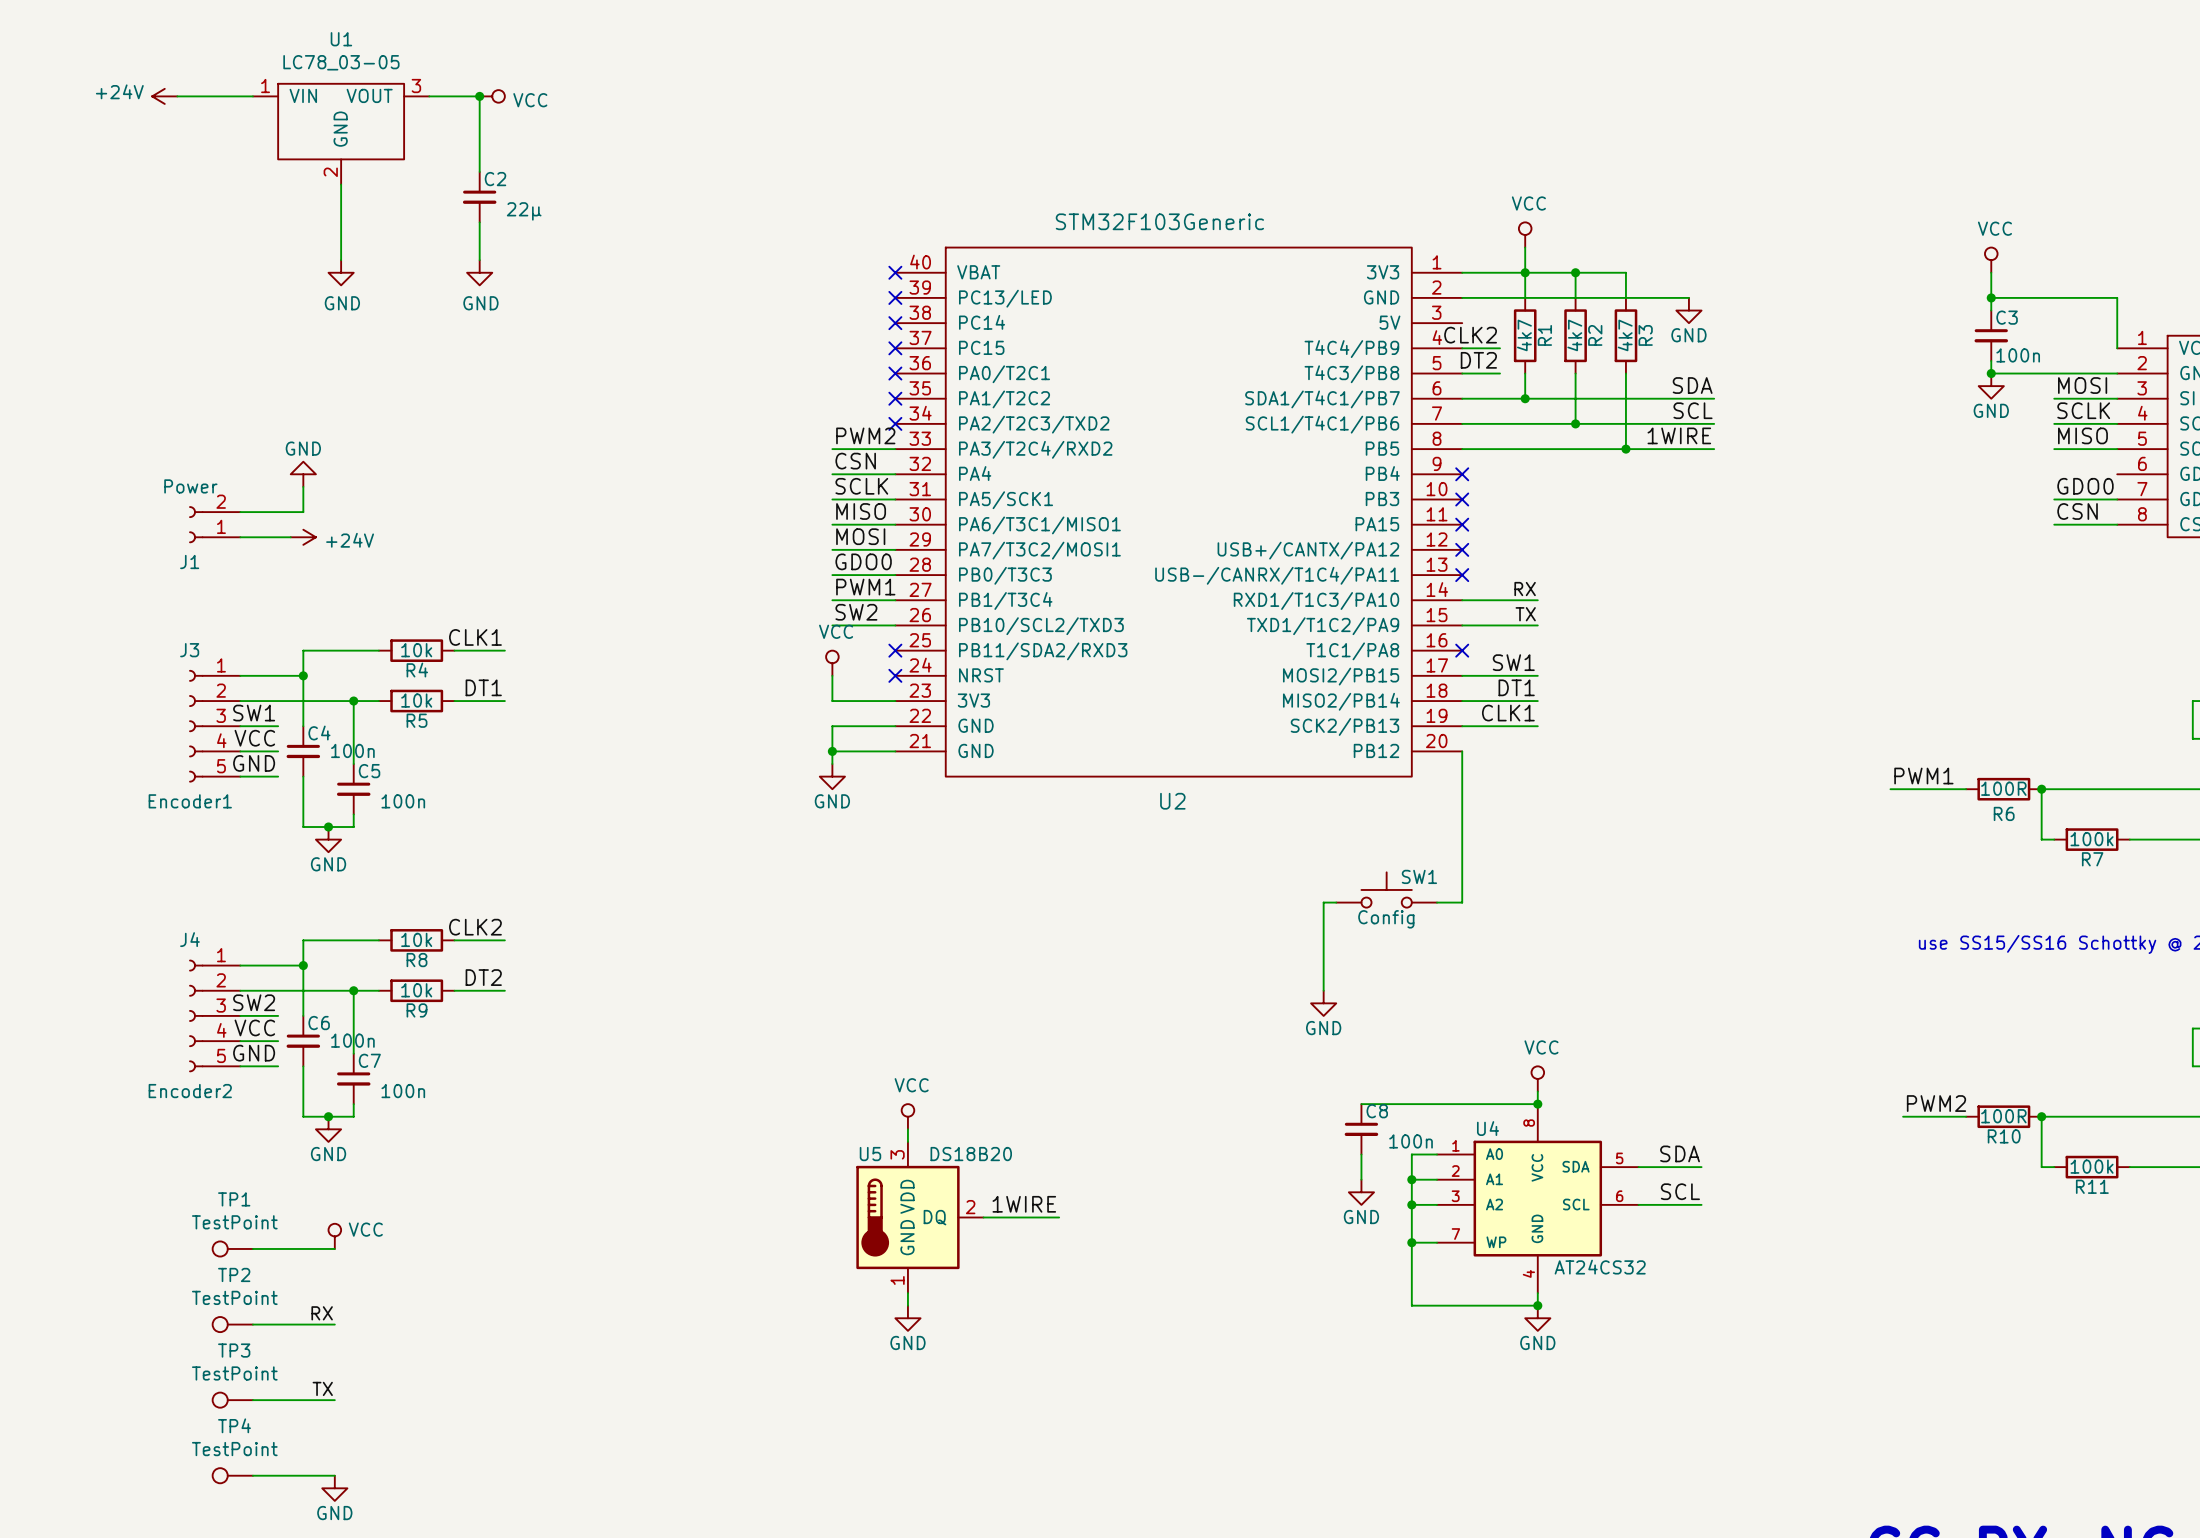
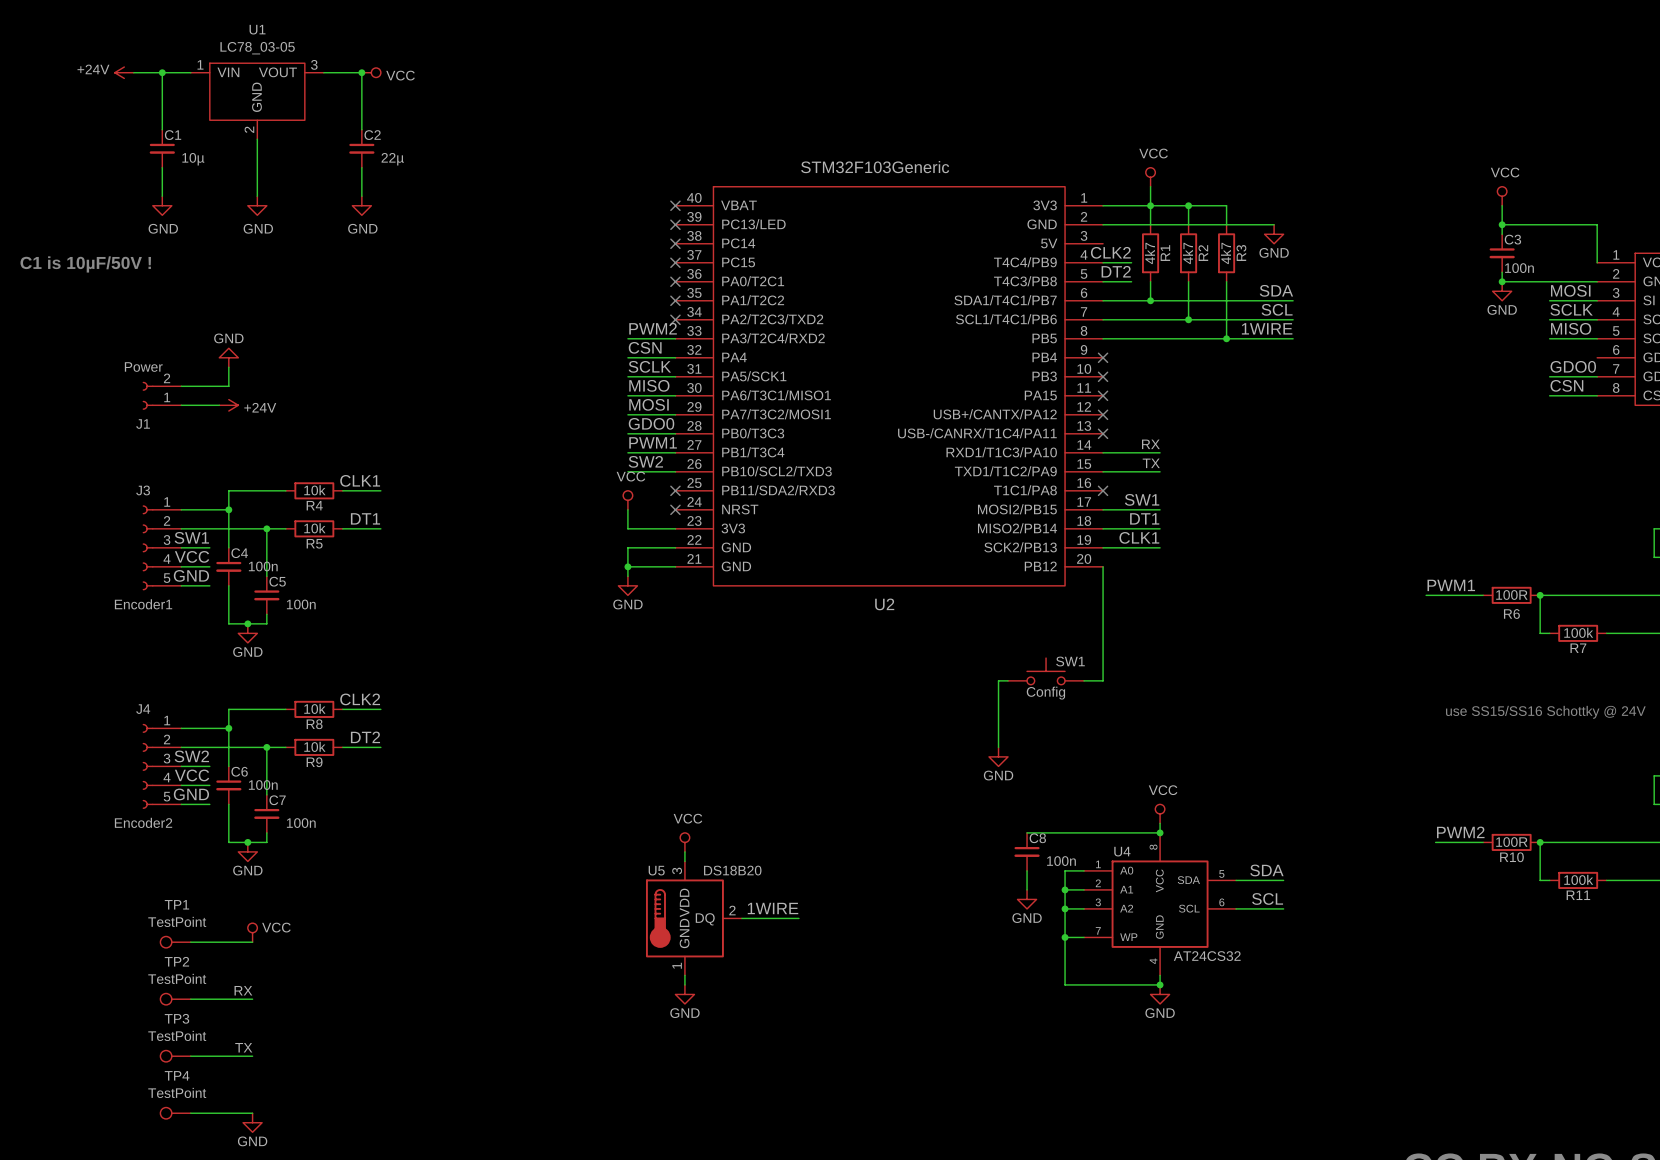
wire: none -> (162, 72) (162, 129)
junction: none -> (162, 72)
C1: none -> 10µ (162, 148)
wire: none -> (162, 167) (162, 196)
power symbol: none -> GND (162, 205)
text: none -> C1 is 10µF/50V ! (85, 264)

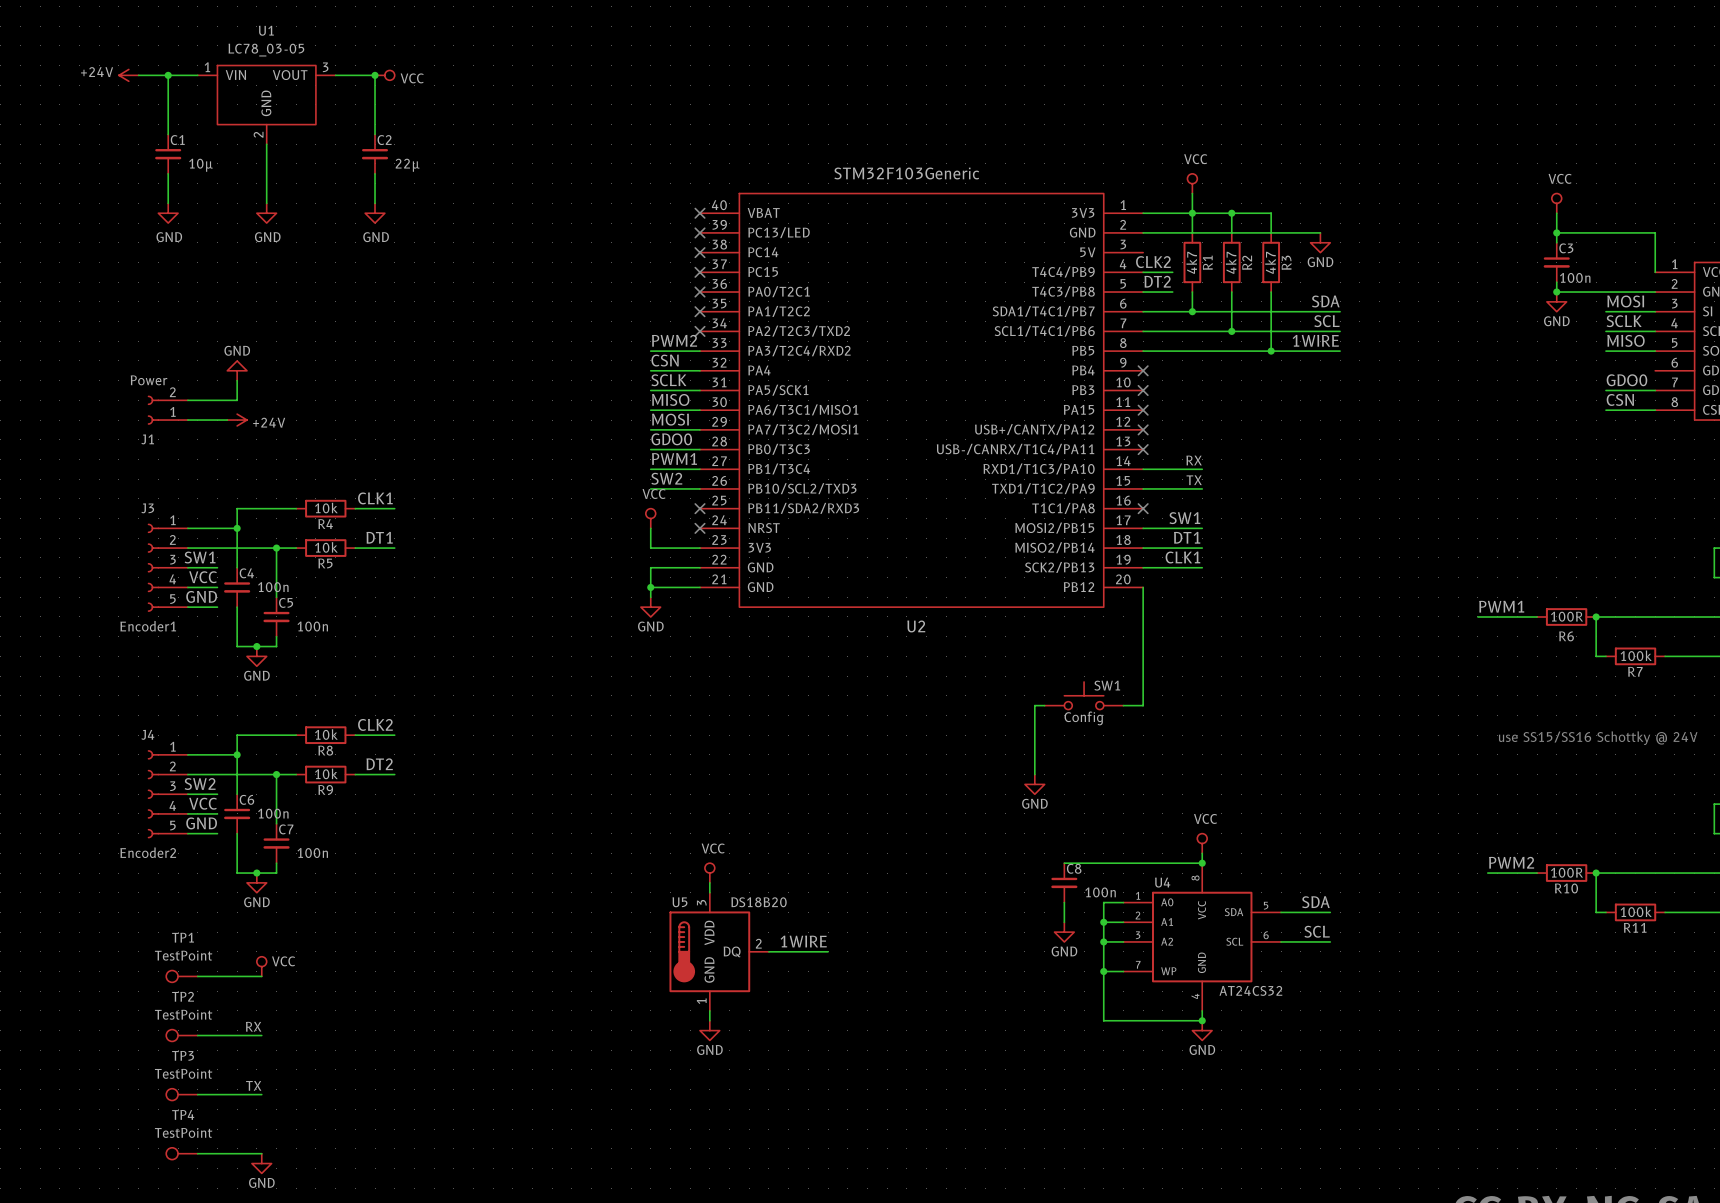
text: C1 is 10µF/50V ! (85, 264) -> none

